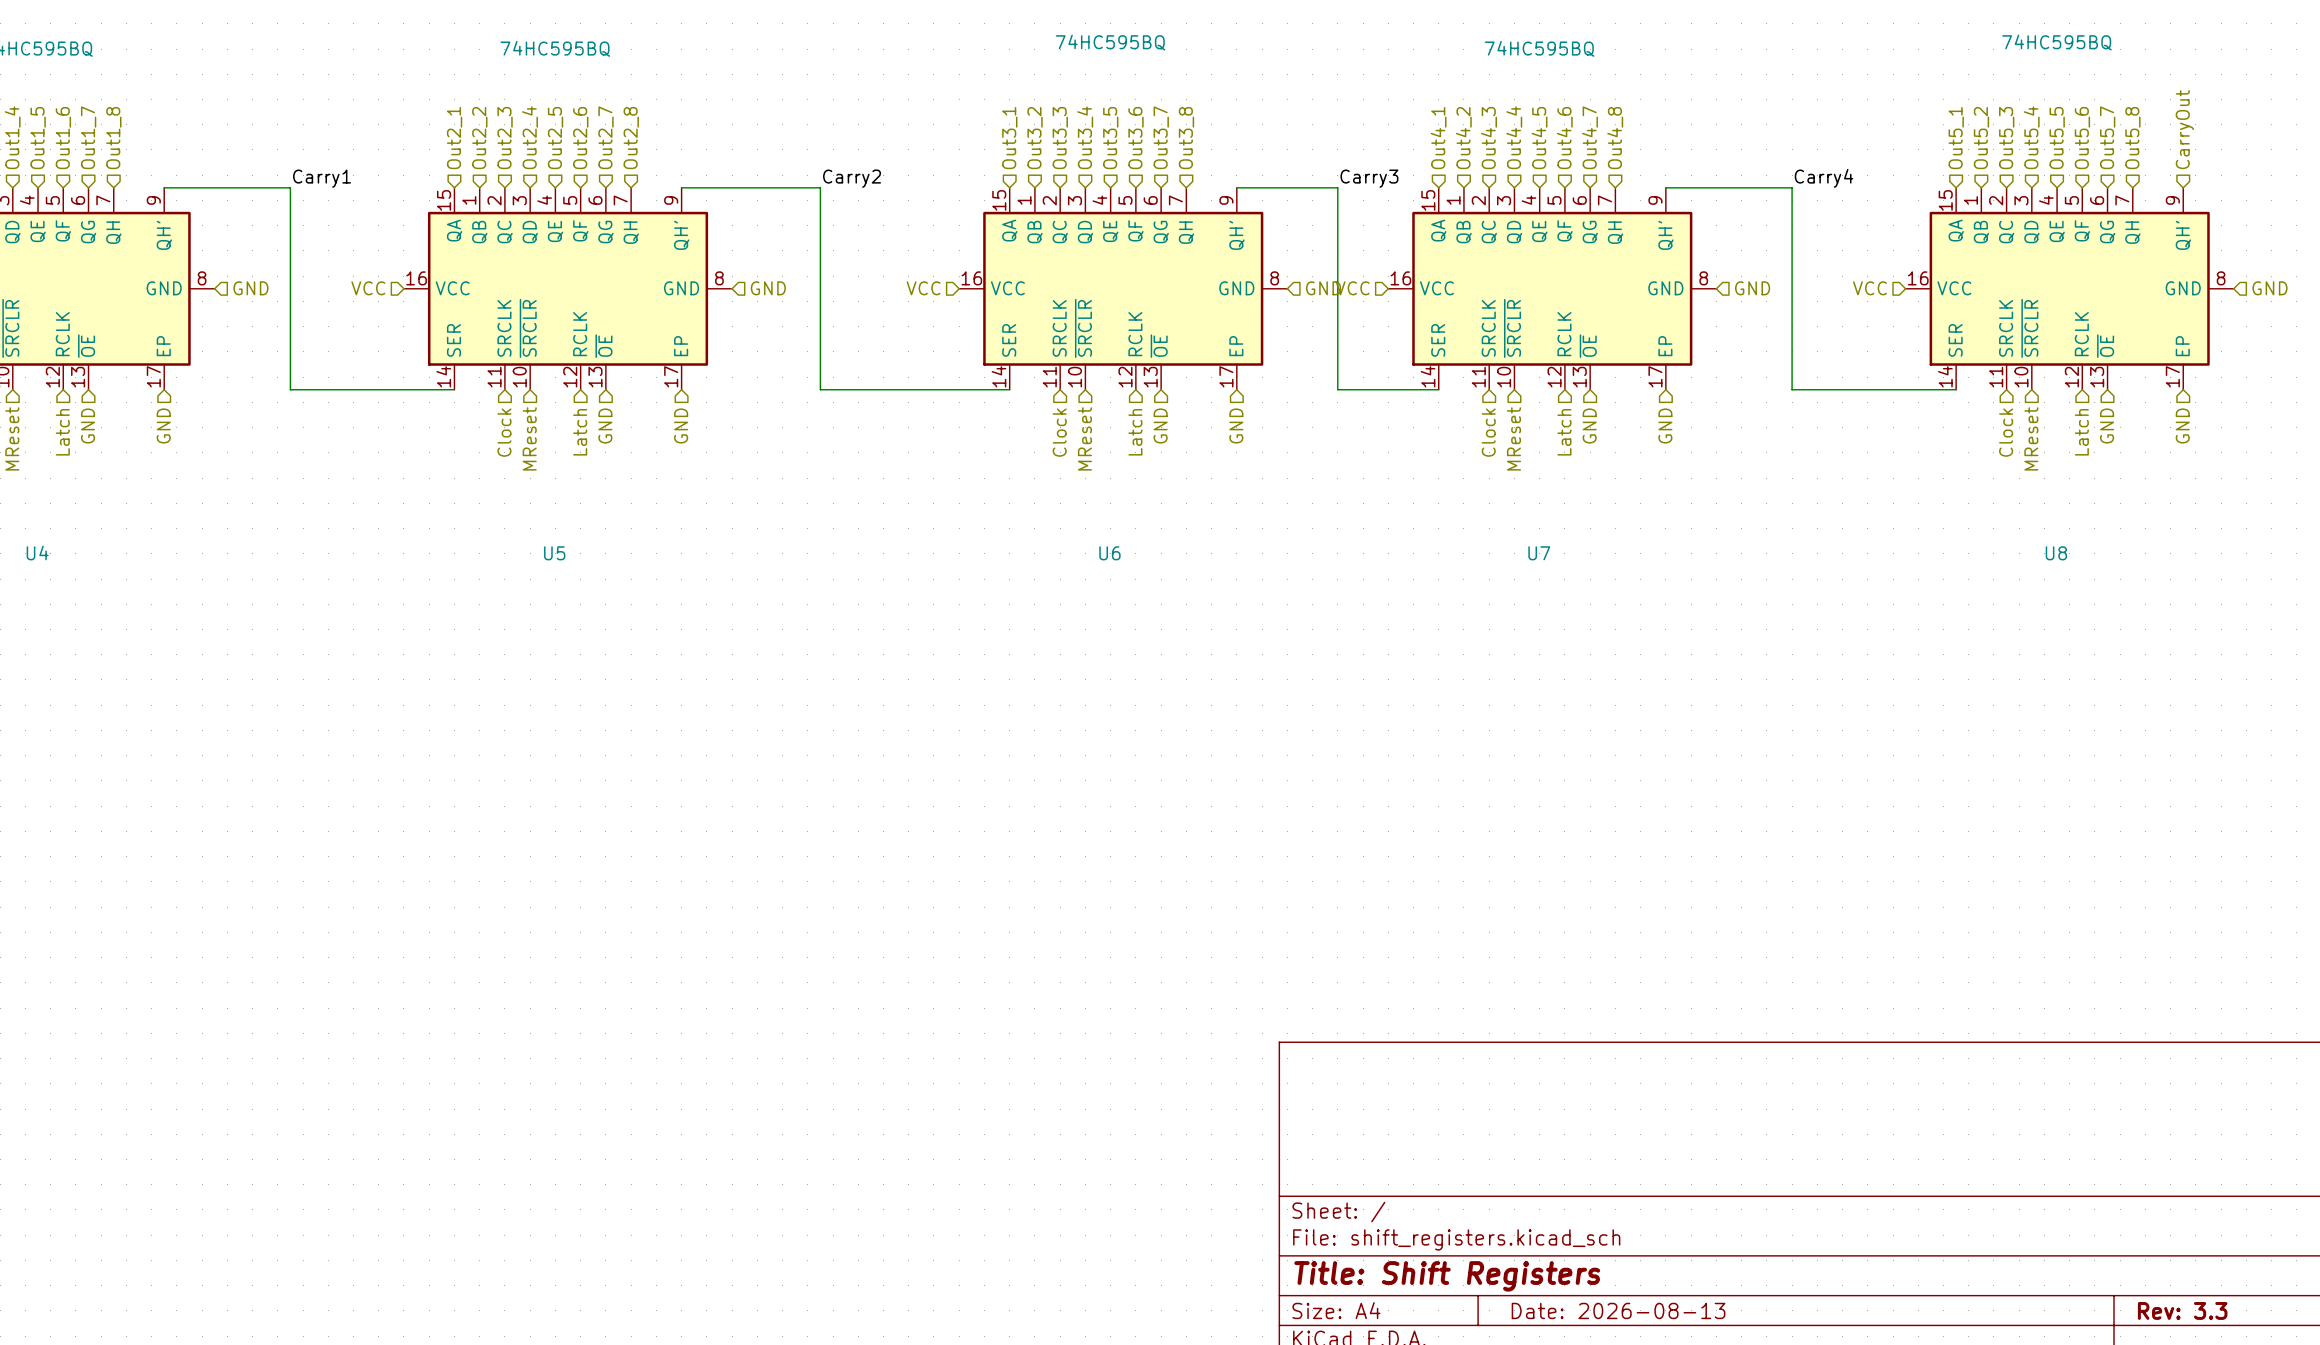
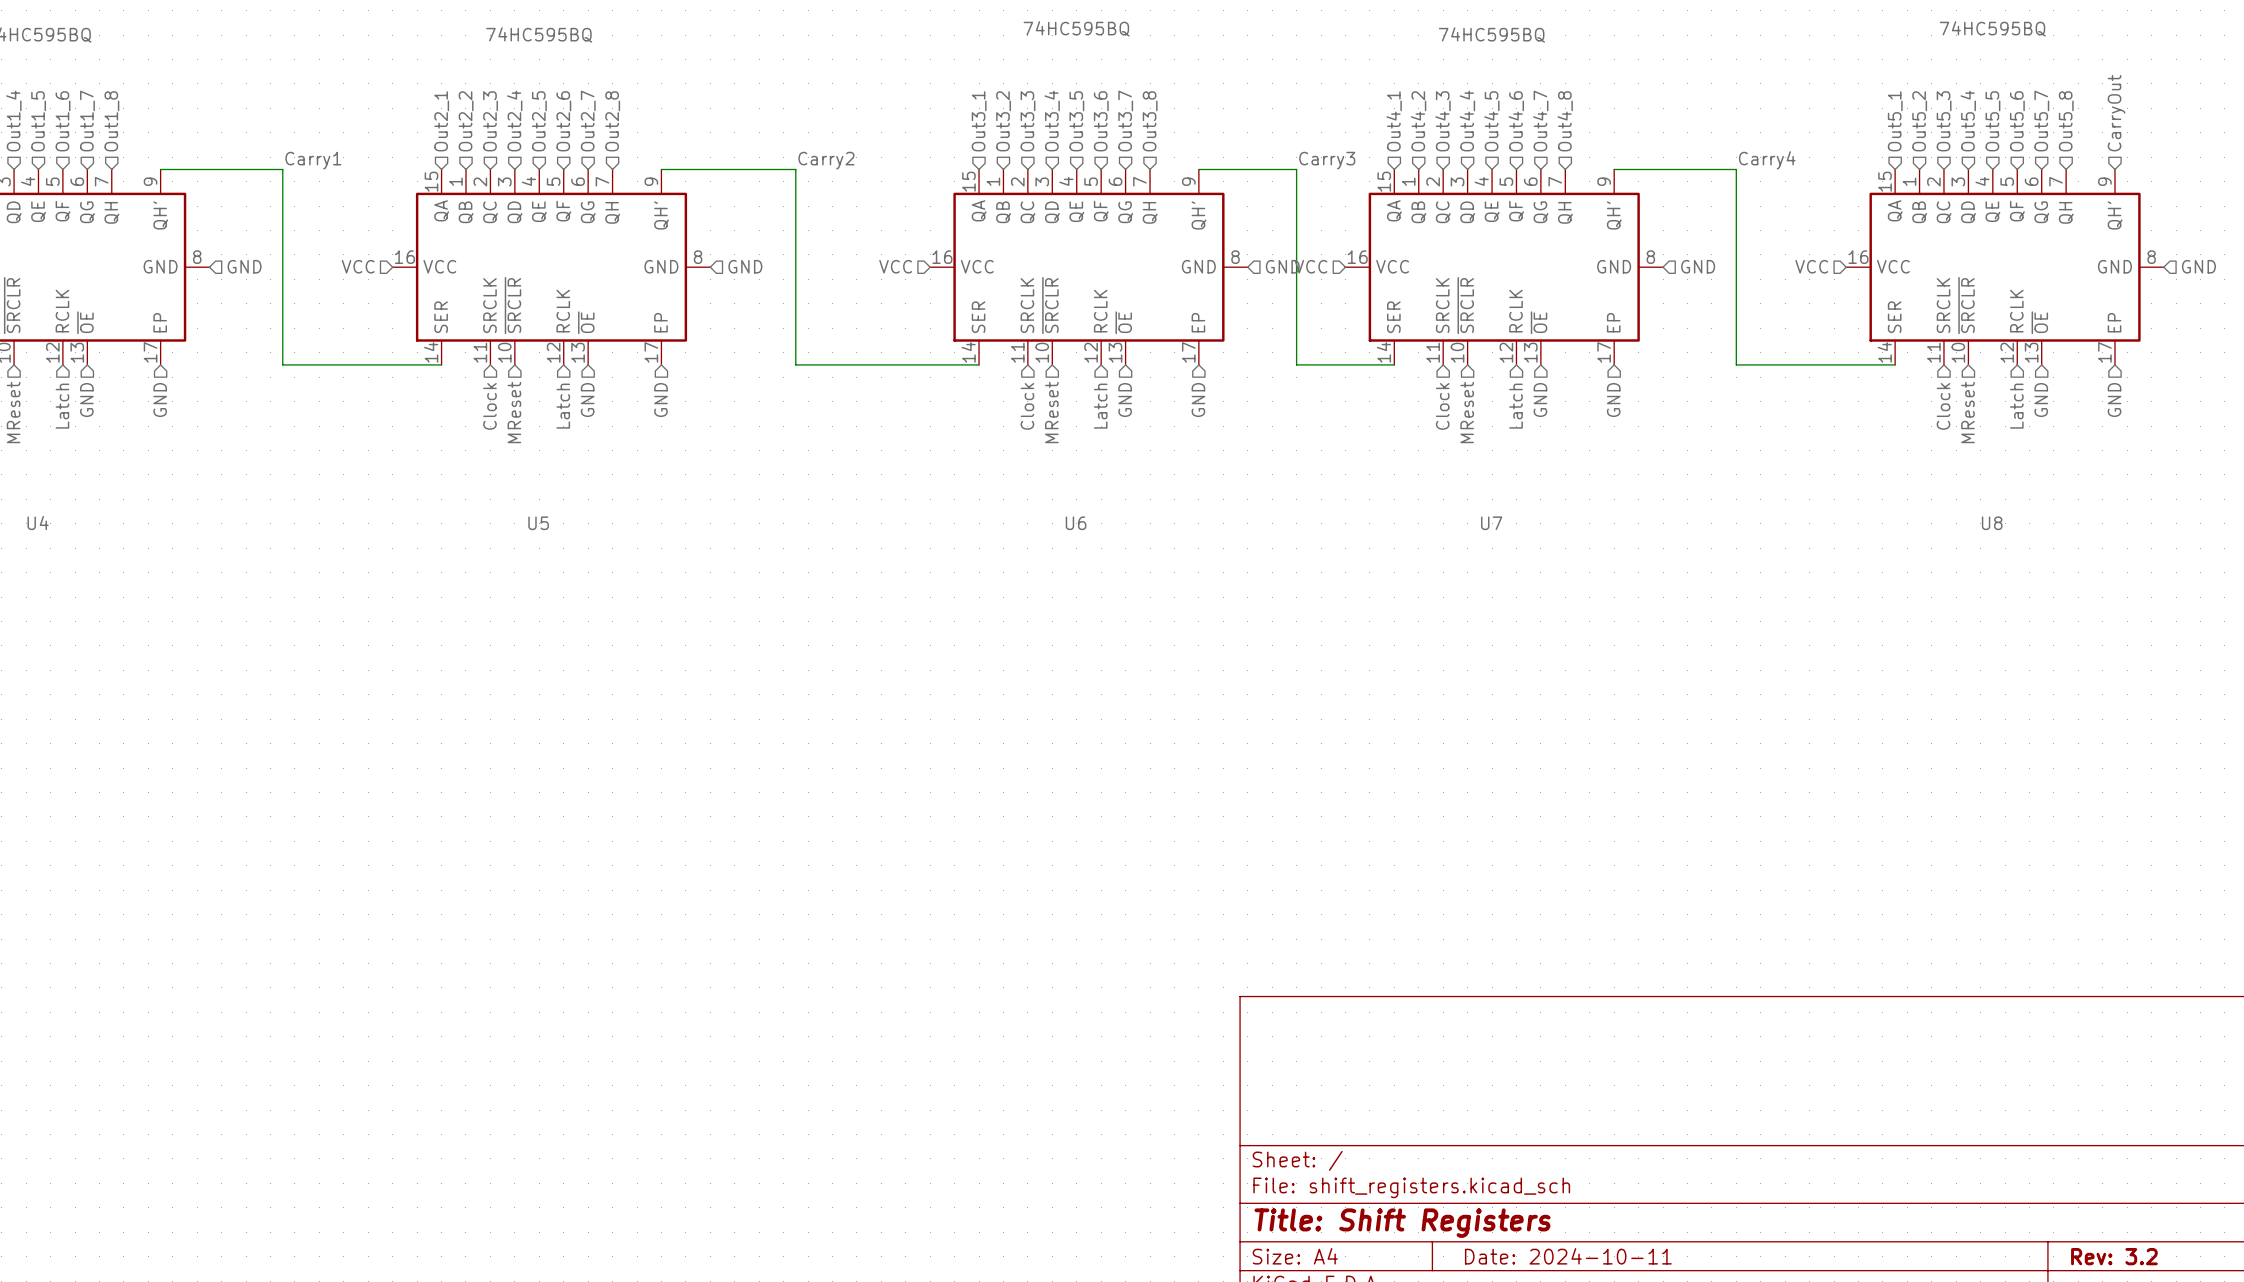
title block: Date: 2026-08-13 (1618, 1310) -> Date: 2024-10-11 (1568, 1256)
title block: Rev: 3.3 (2182, 1310) -> Rev: 3.2 (2114, 1256)

